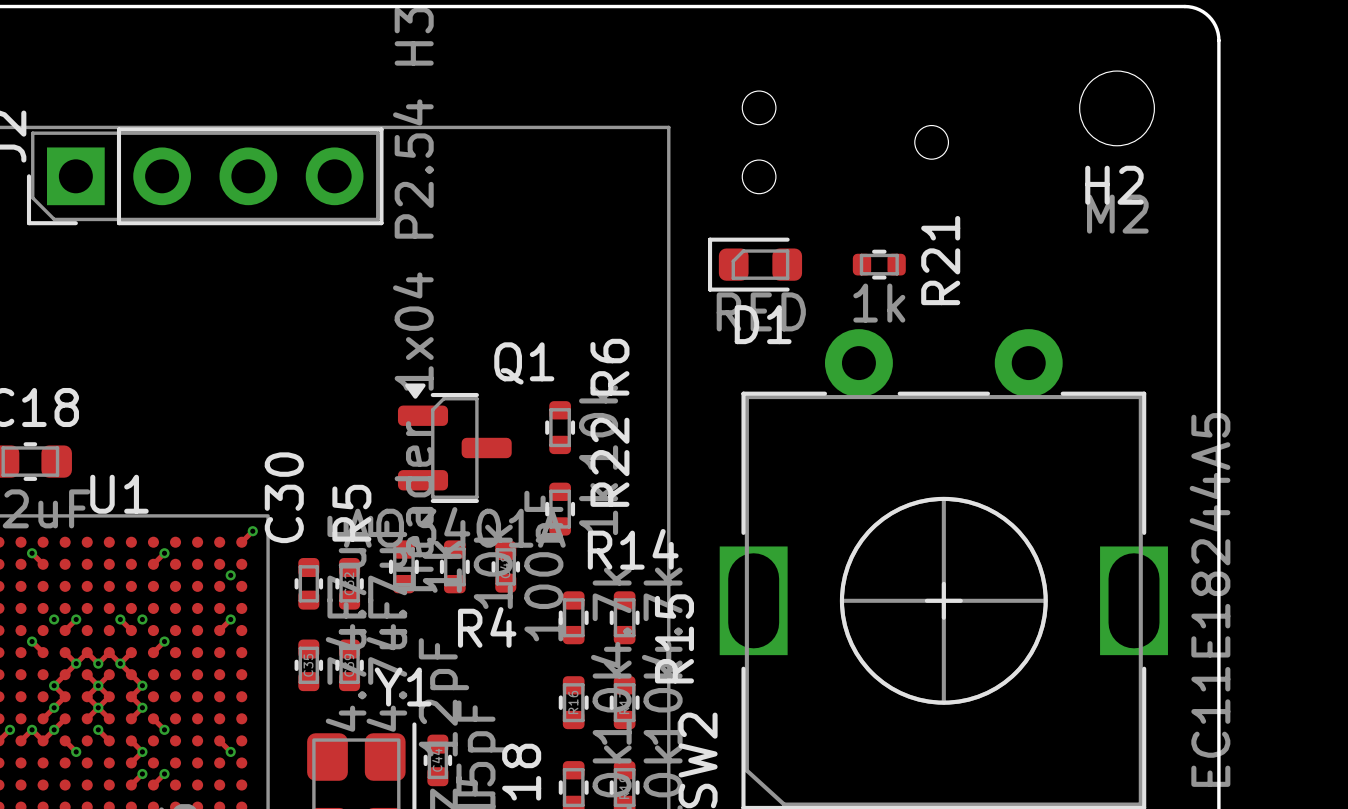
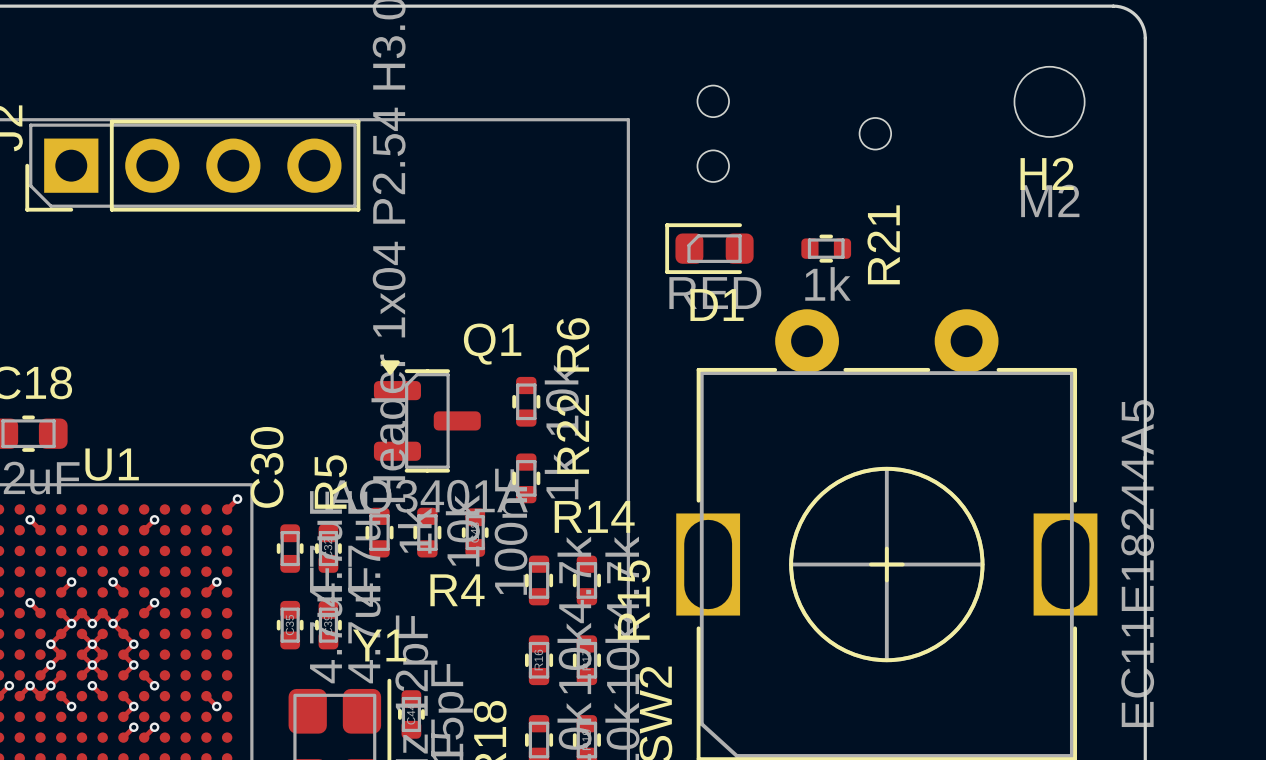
via: (230, 575) -> none
via: (54, 619) -> none
via: (142, 619) -> none

